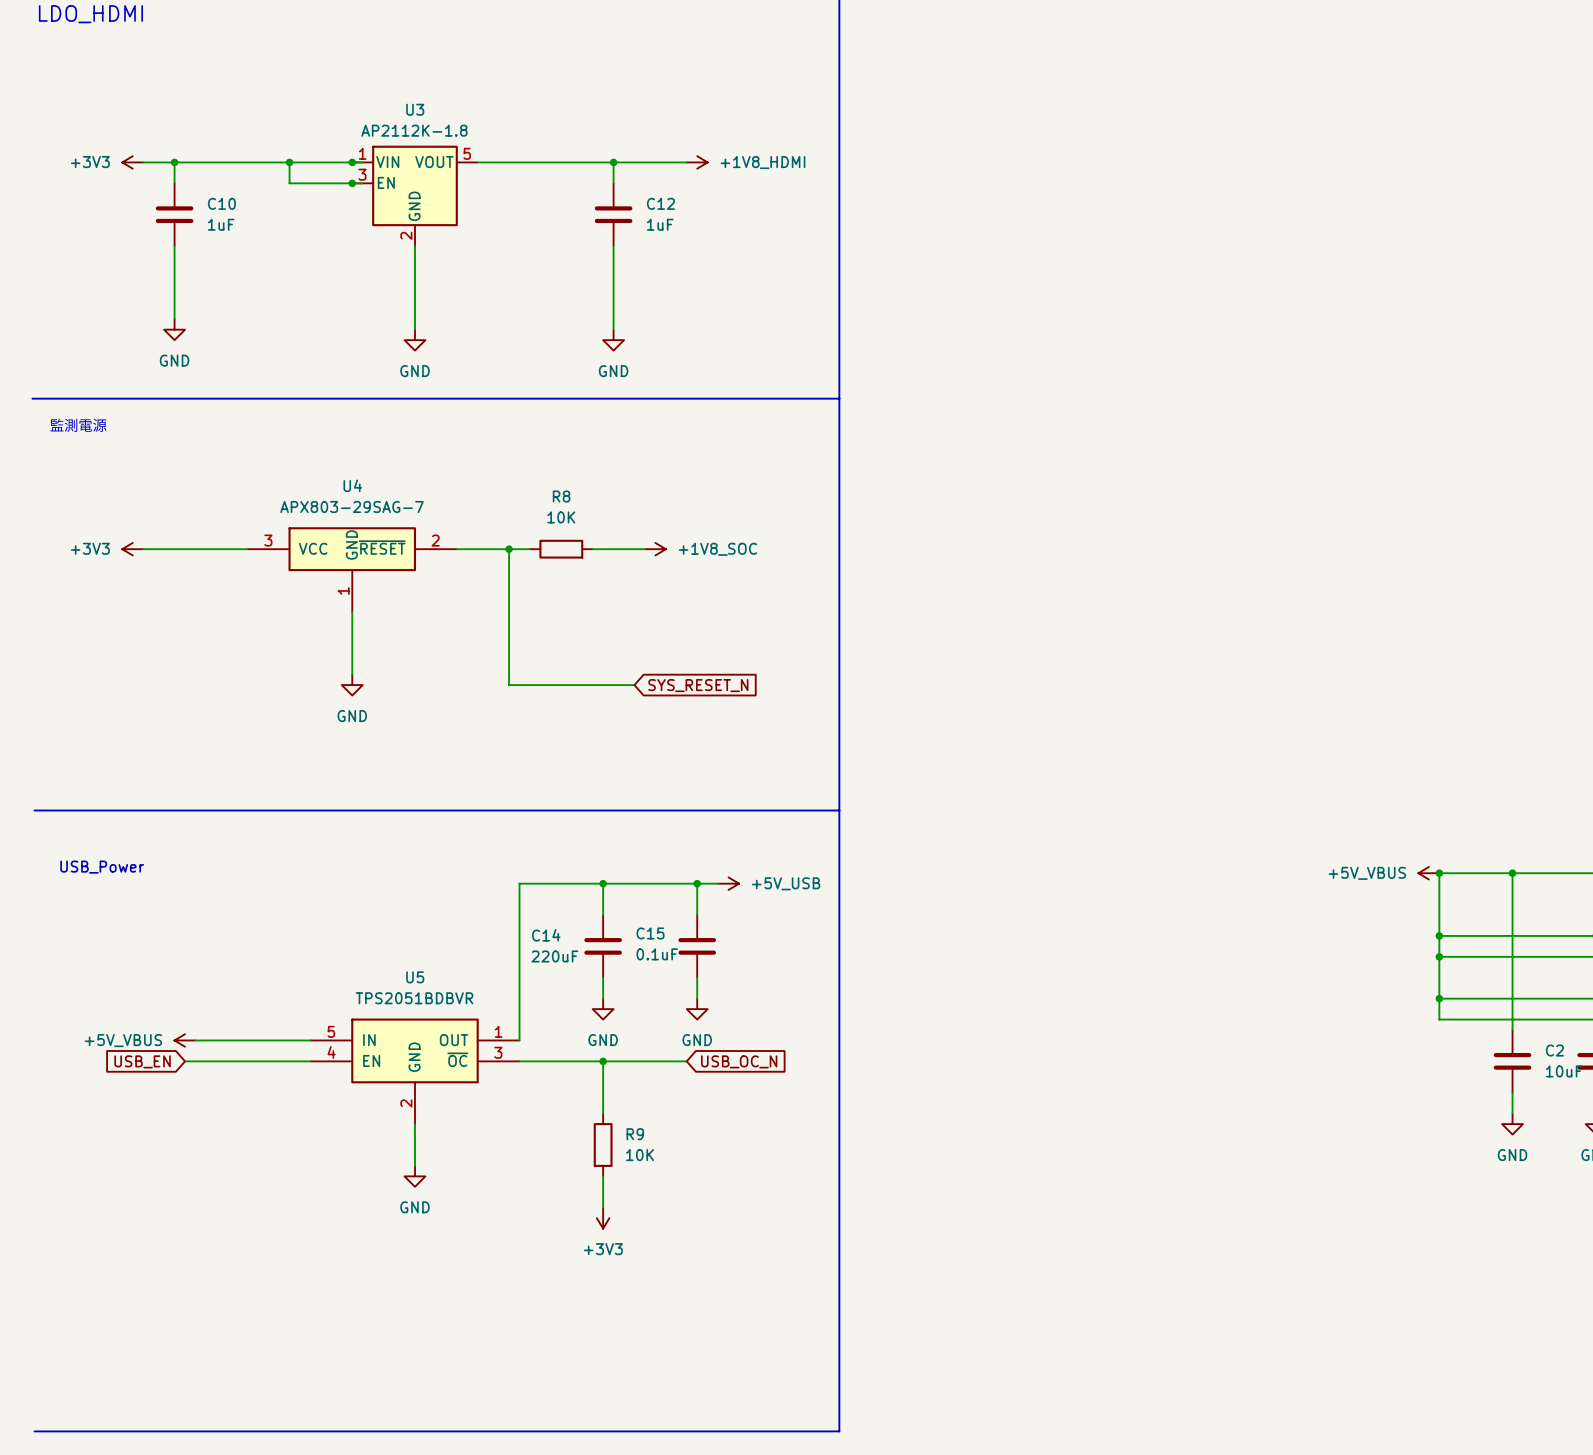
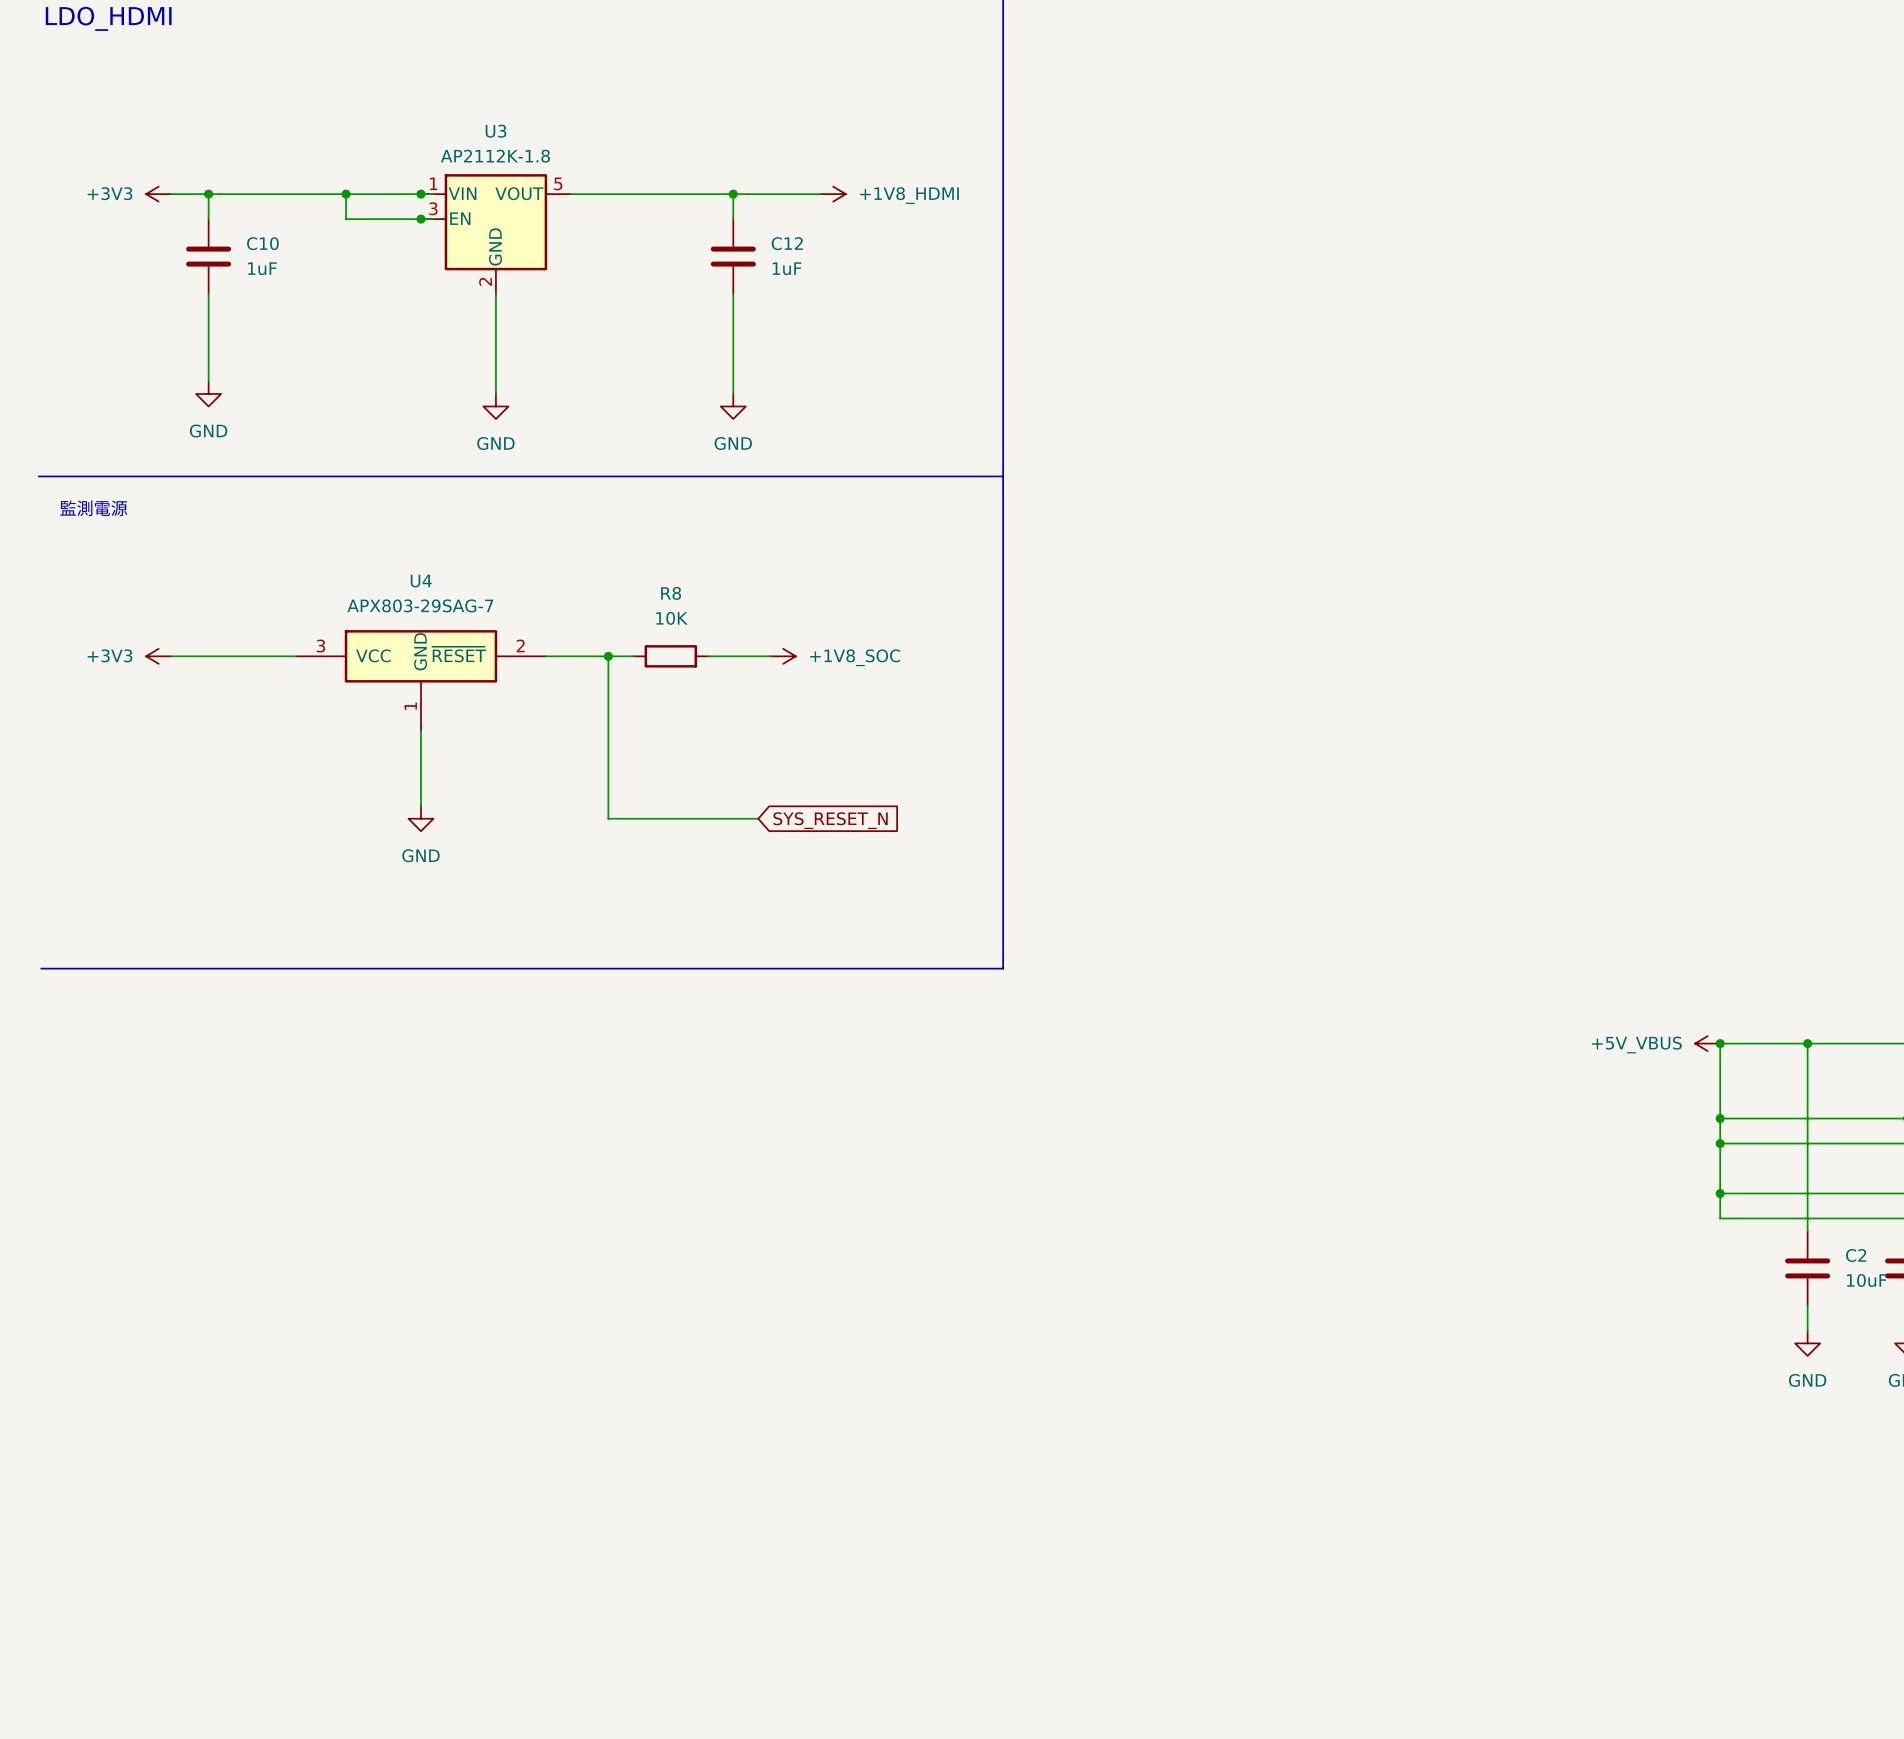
line: (839, 810) (839, 1431) (34, 1431) -> none
text: USB_Power (102, 867) -> none
wire: (603, 883) (603, 915) -> none
junction: (603, 883) -> none
wire: (697, 883) (697, 915) -> none
junction: (697, 883) -> none
wire: (718, 883) (519, 883) (519, 1040) -> none
power symbol: +5V_USB (728, 883) -> none
C14: 220uF (603, 946) -> none
C15: 0.1uF (697, 946) -> none
wire: (603, 977) (603, 998) -> none
wire: (697, 977) (697, 998) -> none
power symbol: GND (603, 1009) -> none
power symbol: GND (697, 1009) -> none
power symbol: +5V_VBUS (185, 1040) -> none
wire: (195, 1040) (310, 1040) -> none
global label: USB_EN (142, 1061) -> none
wire: (185, 1061) (310, 1061) -> none
wire: (519, 1061) (686, 1061) -> none
wire: (603, 1061) (603, 1113) -> none
junction: (603, 1061) -> none
global label: USB_OC_N (739, 1061) -> none
U5: TPS2051BDBVR (414, 1071) -> none
wire: (414, 1124) (414, 1165) -> none
R9: 10K (603, 1145) -> none
power symbol: GND (414, 1176) -> none
wire: (603, 1176) (603, 1207) -> none
power symbol: +3V3 (603, 1218) -> none

